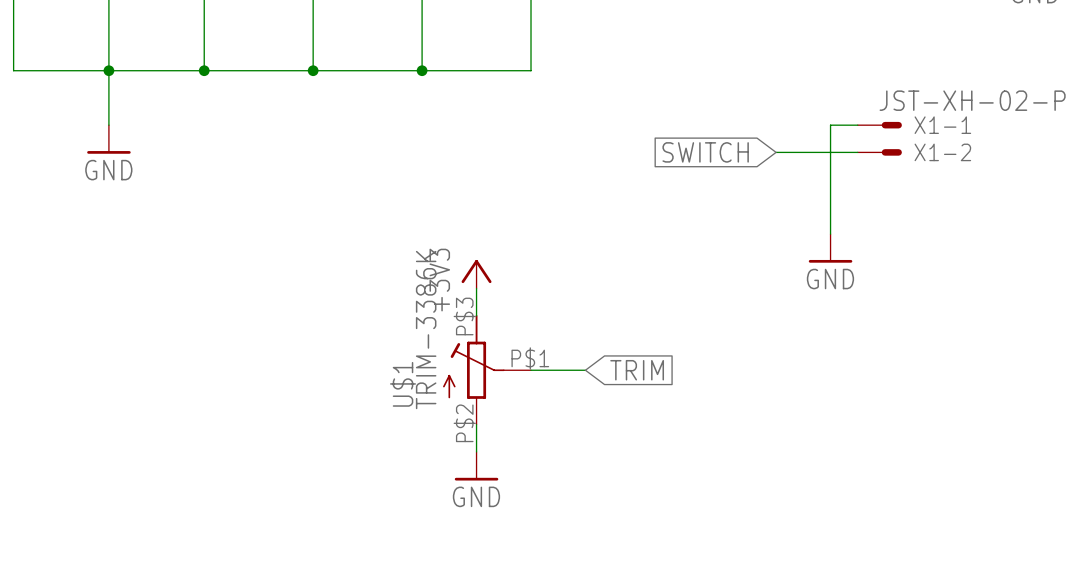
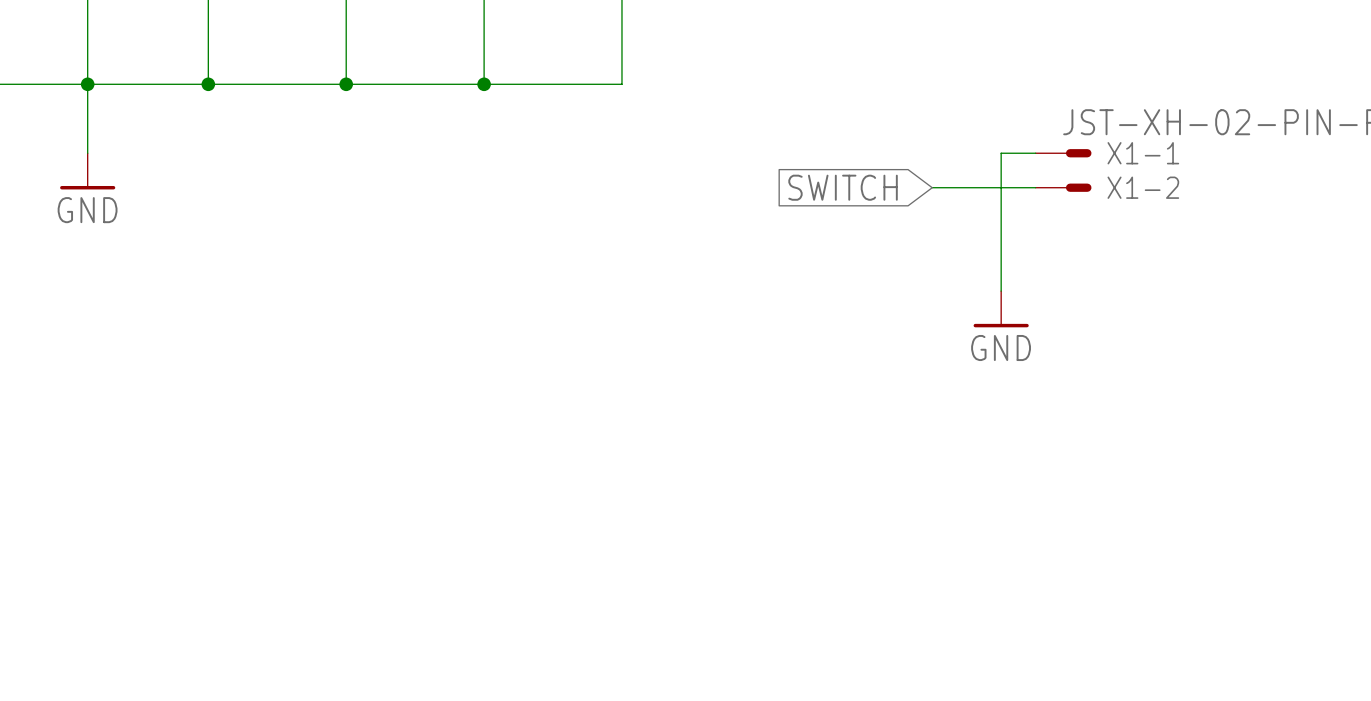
power symbol: +3V3 (476, 274) -> none
wire: (476, 288) (476, 315) -> none
U$1: TRIM-3386K (487, 369) -> none
wire: (531, 370) (585, 370) -> none
global label: TRIM (637, 370) -> none
wire: (476, 424) (476, 451) -> none
power symbol: GND (476, 466) -> none

